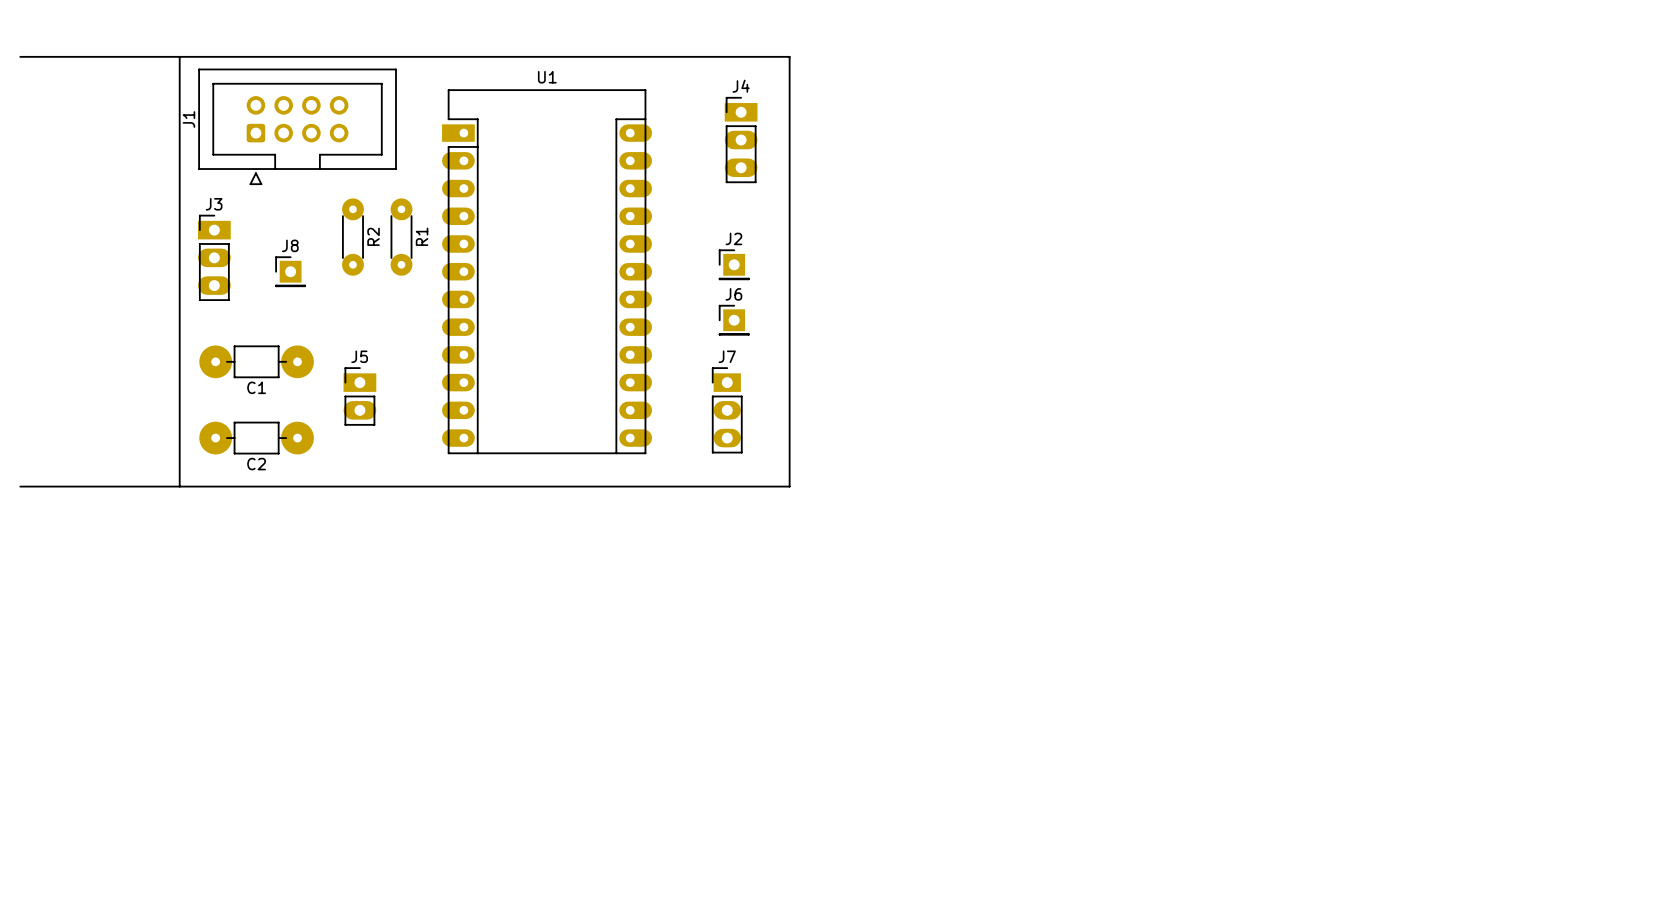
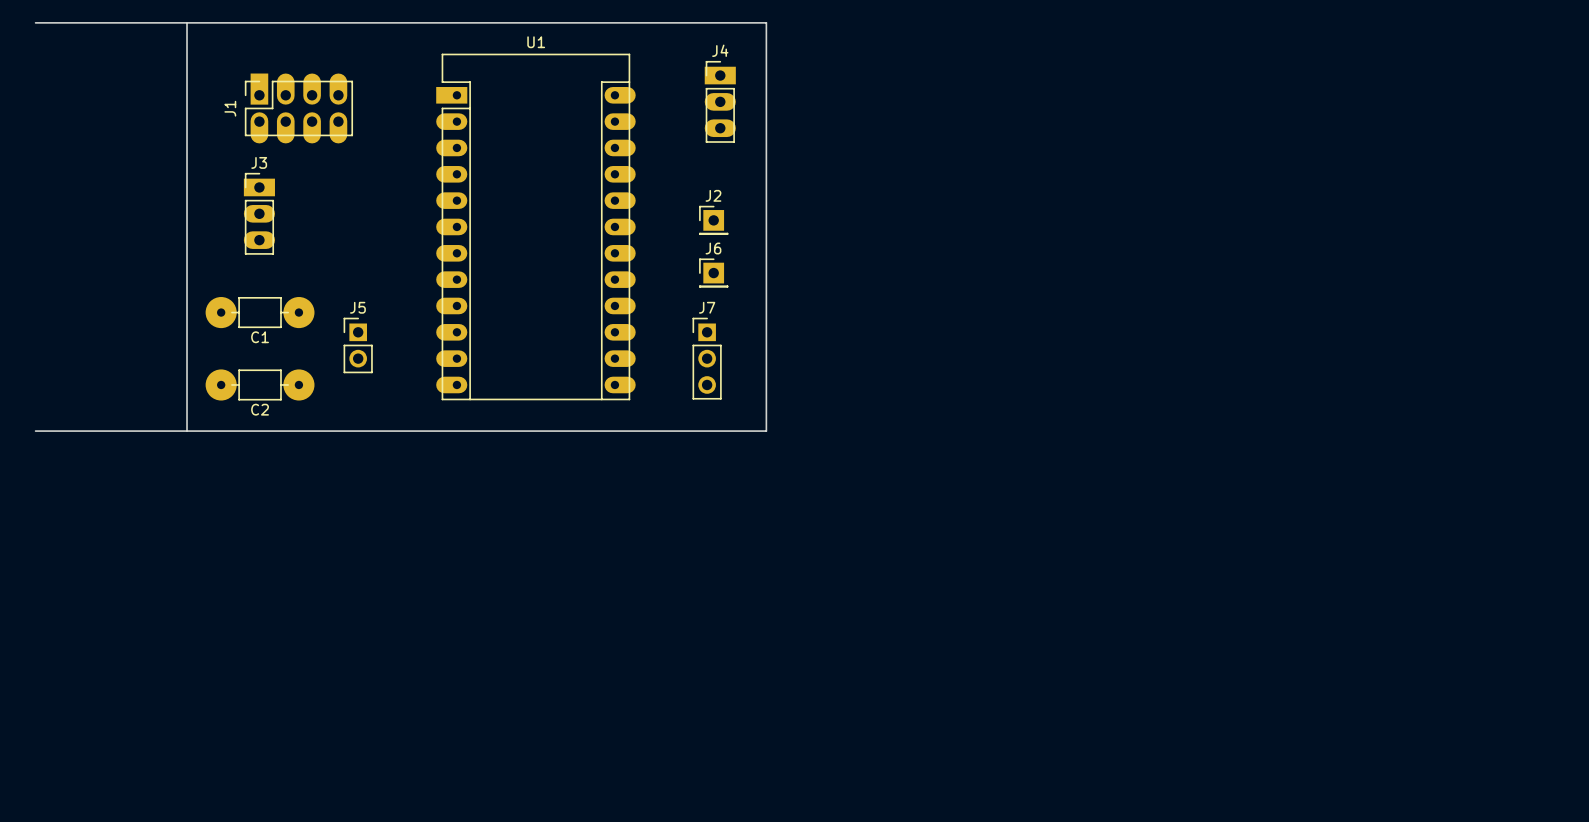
J1 footprint: [198, 68, 397, 185] -> [245, 73, 353, 144]
J1 name position: J1 (188, 119) -> J1 (230, 108)
R2: (352, 237) -> none
R1: (401, 237) -> none
J3 position: (214, 257) -> (259, 213)
J8: (290, 271) -> none
J5 footprint: [343, 367, 377, 426] -> [343, 317, 373, 374]
J7 footprint: [712, 367, 743, 454] -> [692, 317, 722, 400]

